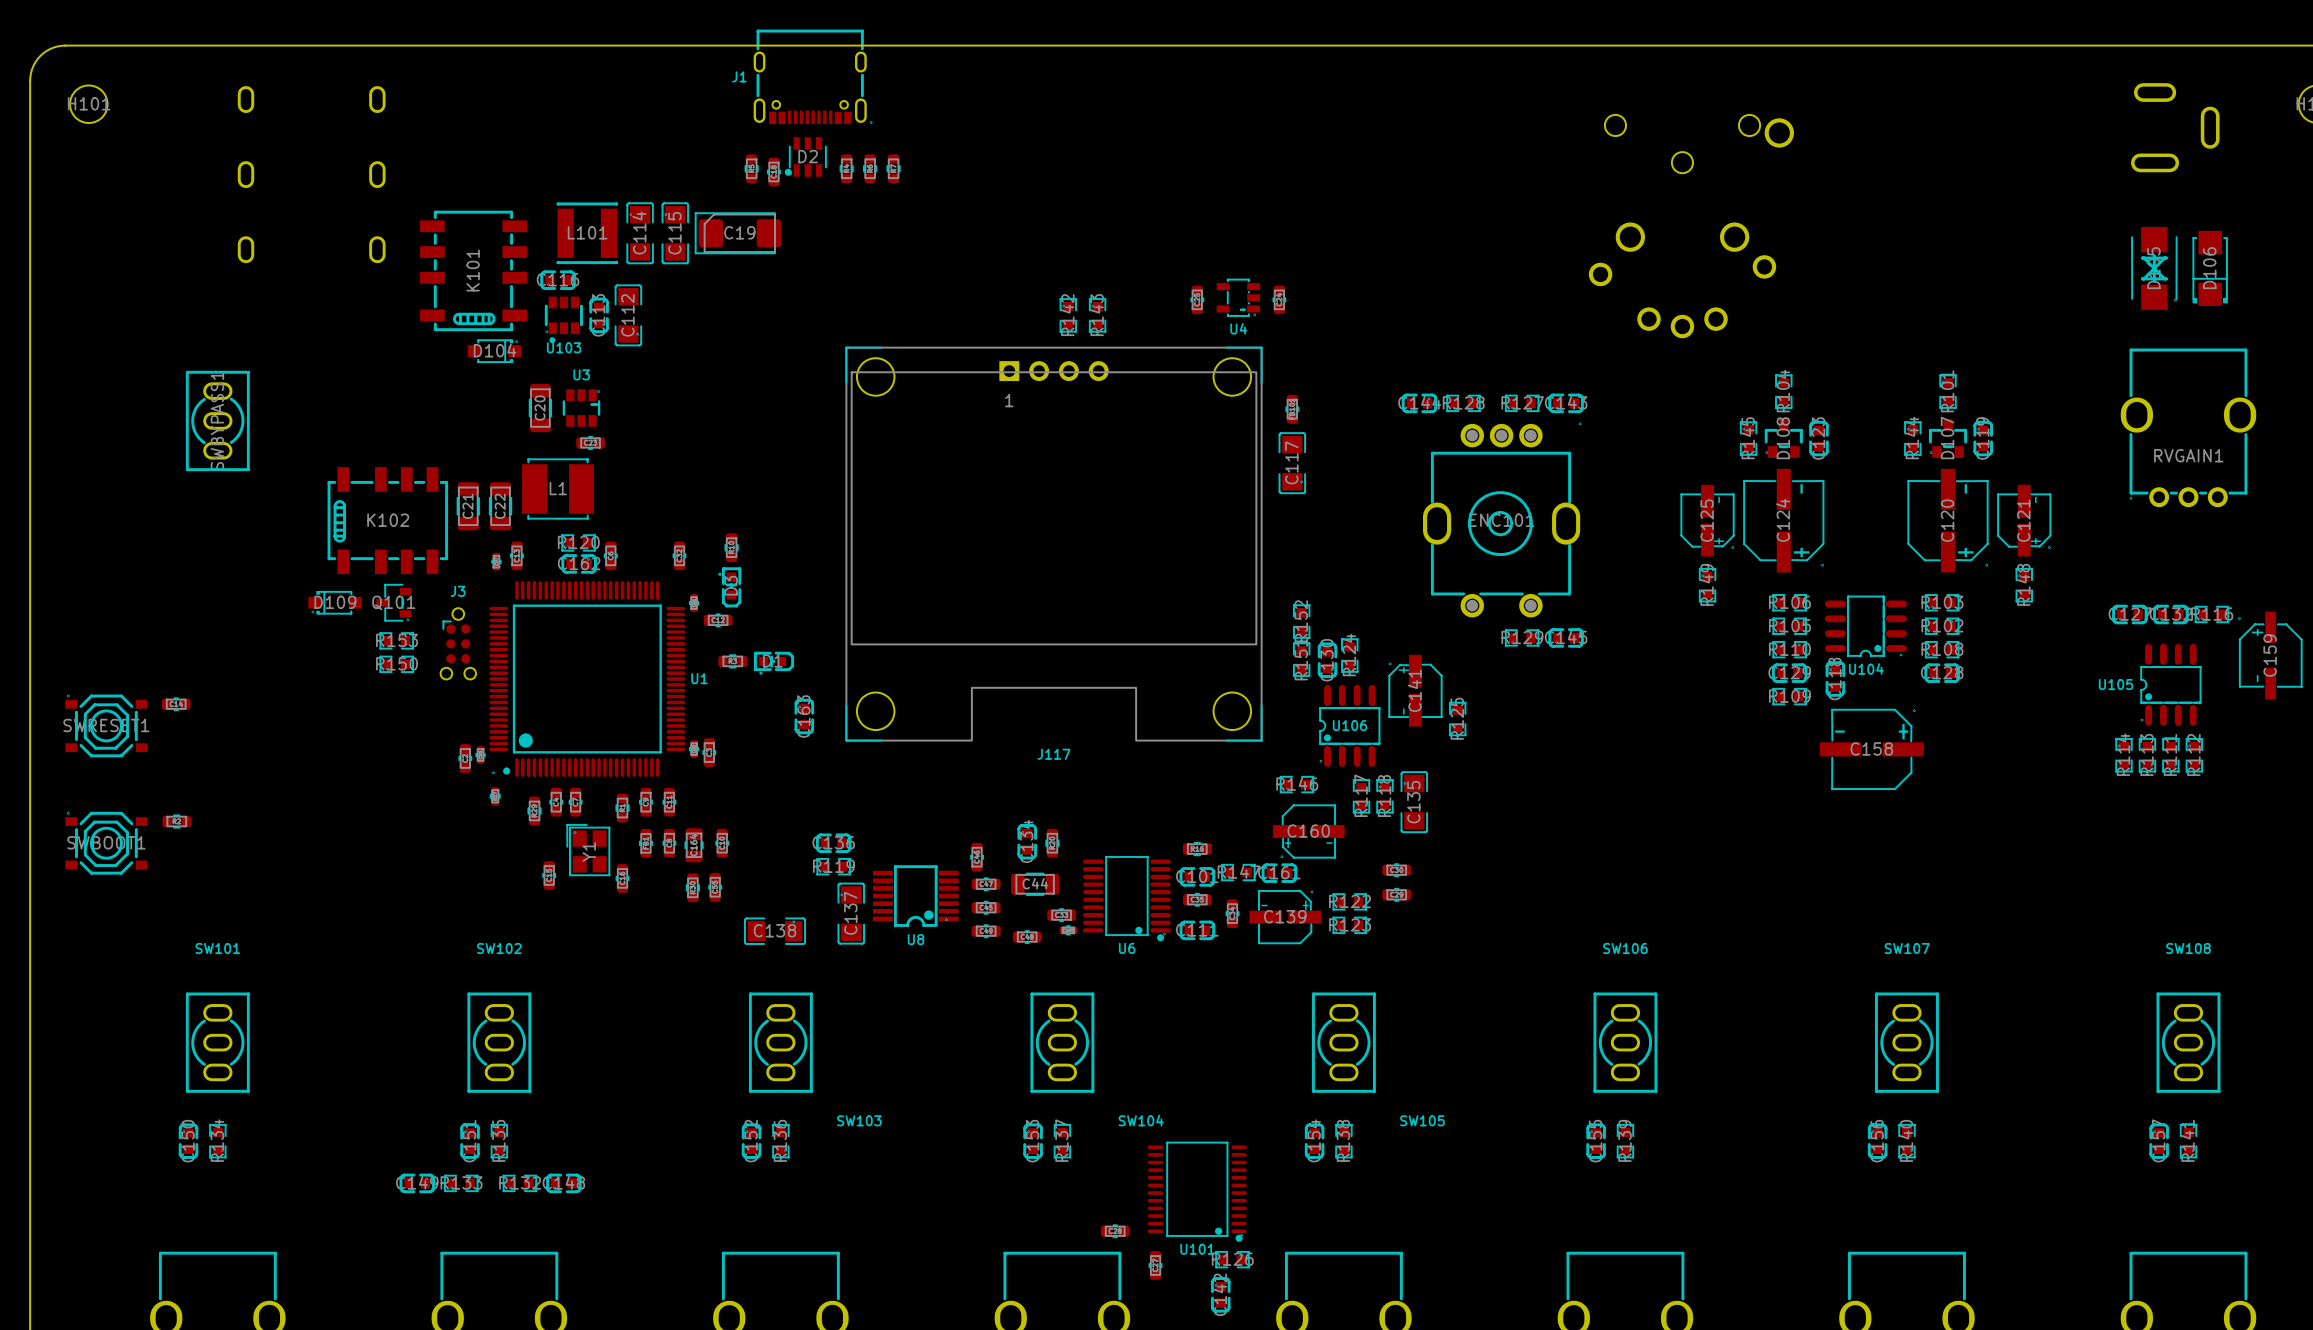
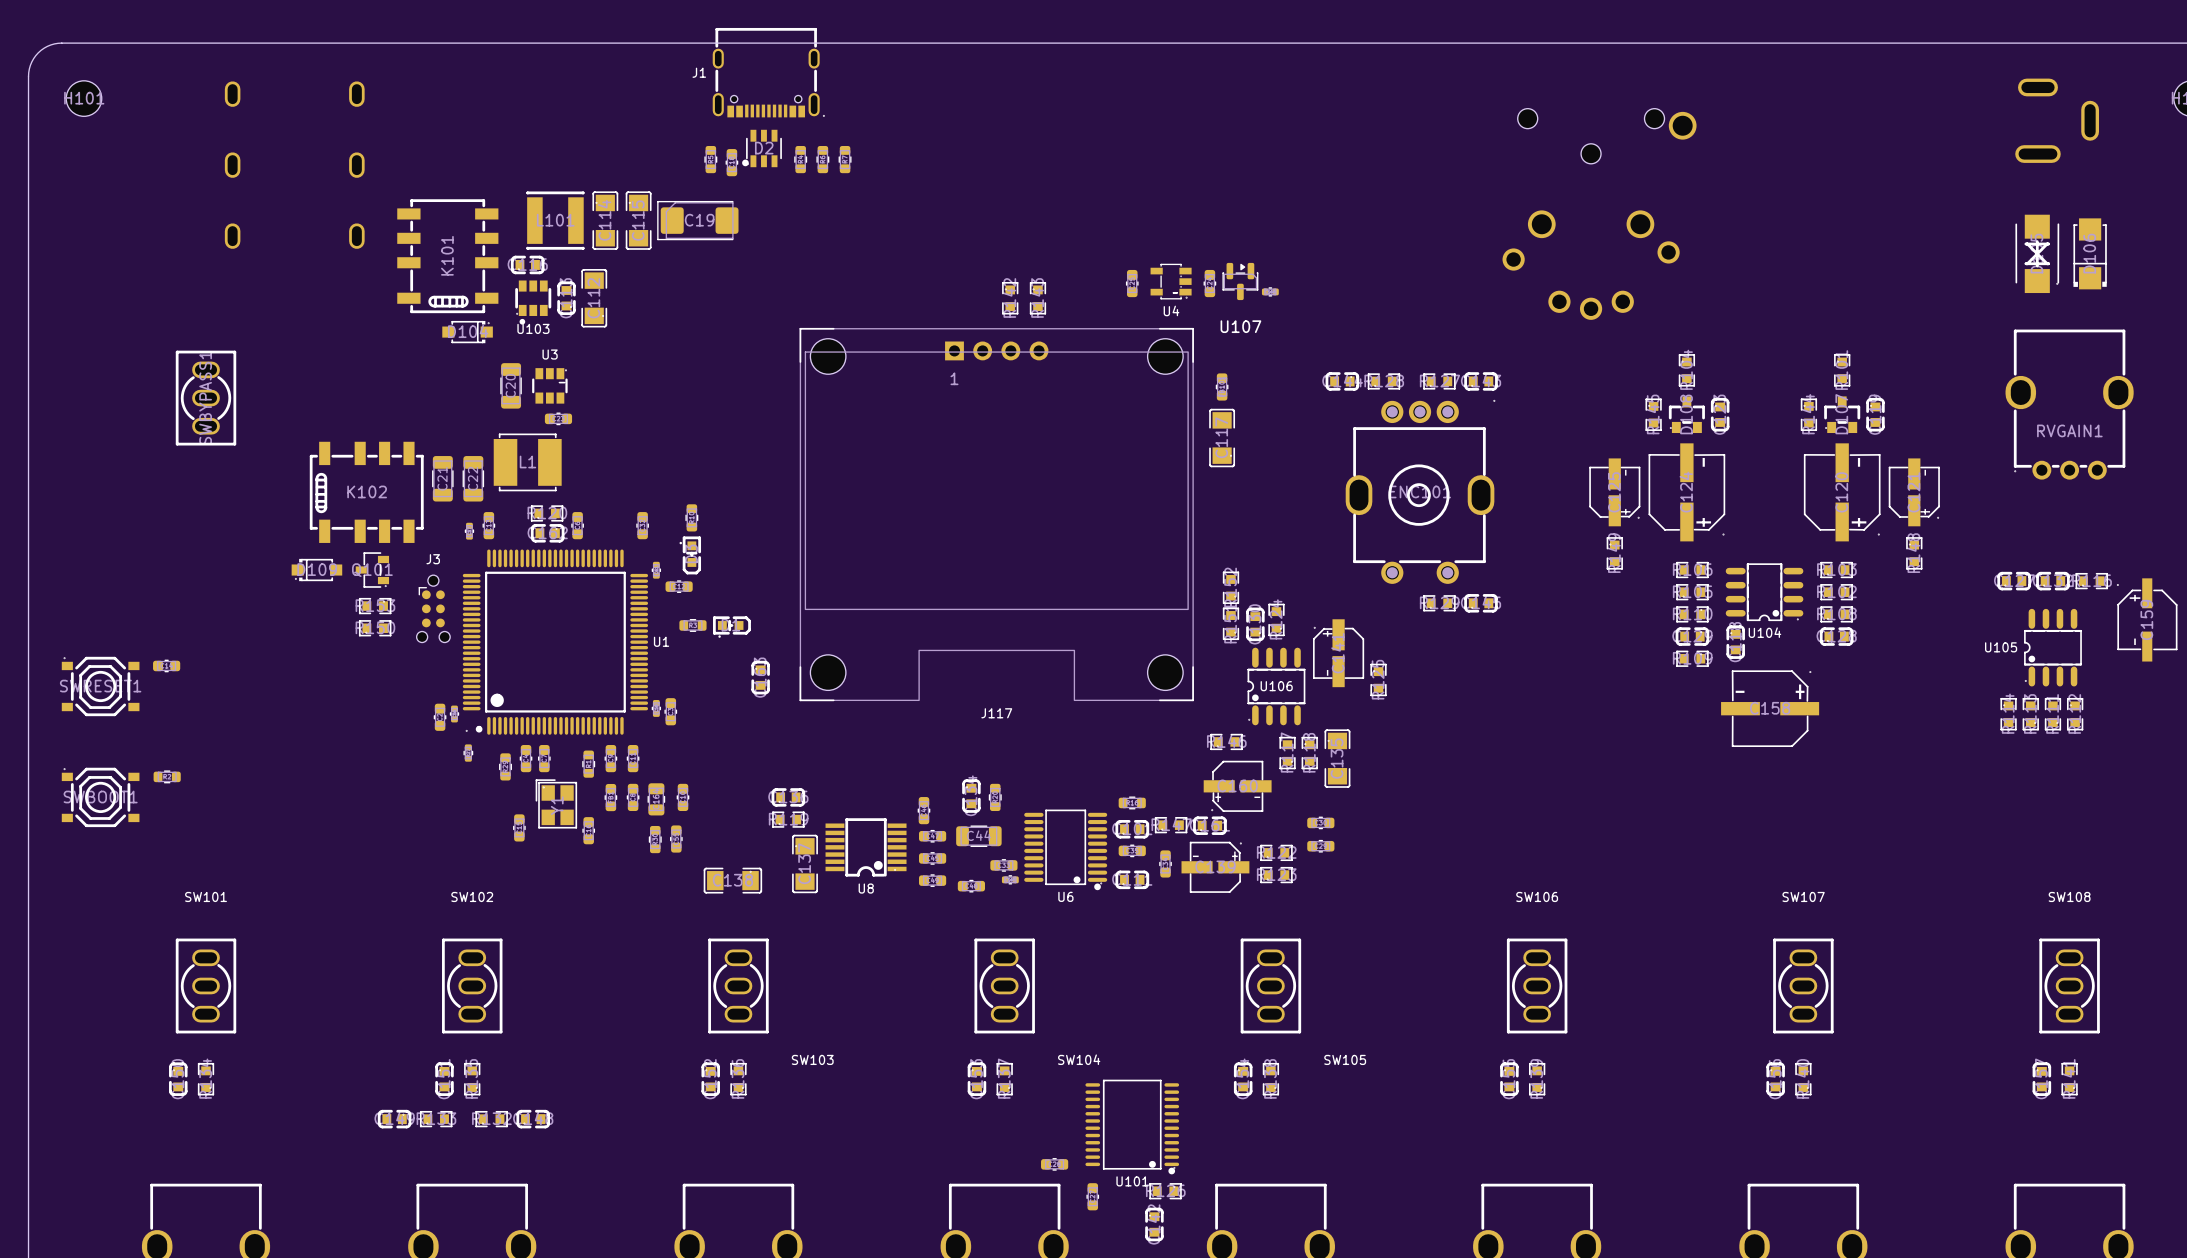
U107: none -> (1240, 281)
part: none -> (1270, 291)

